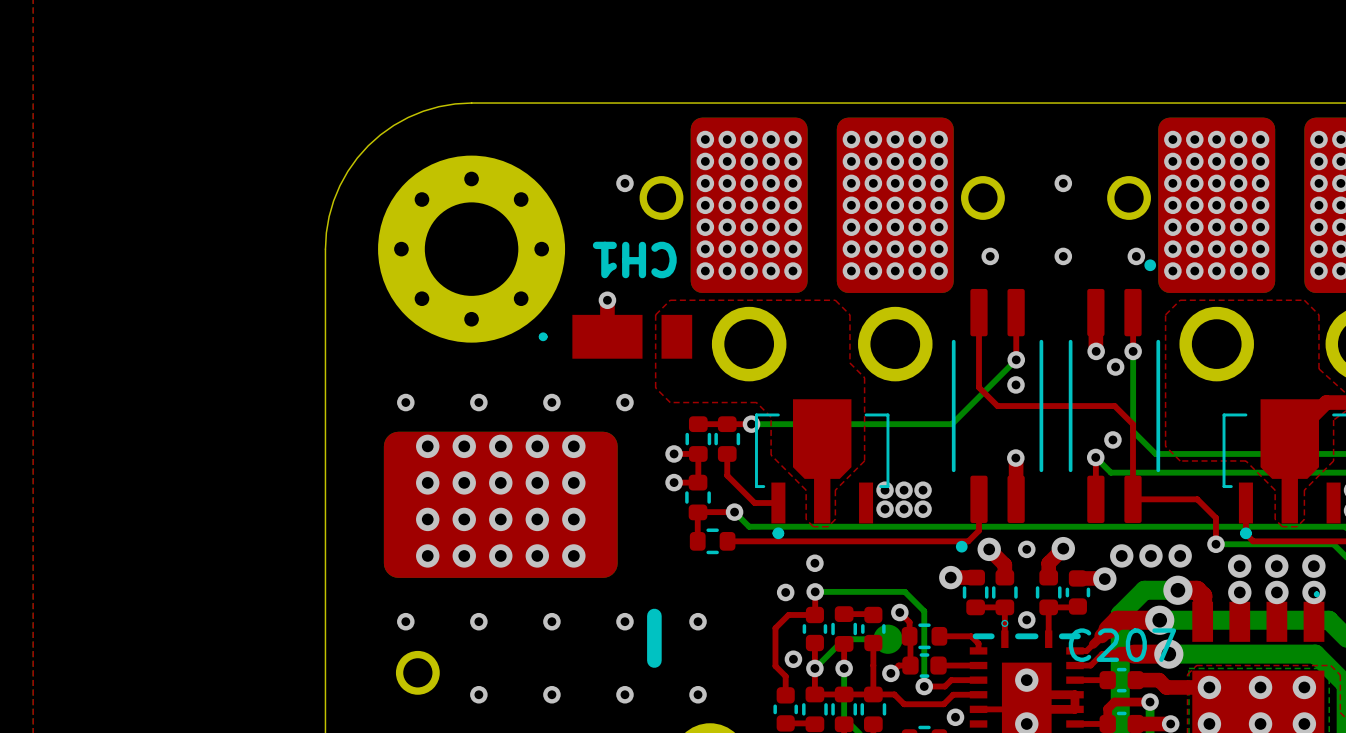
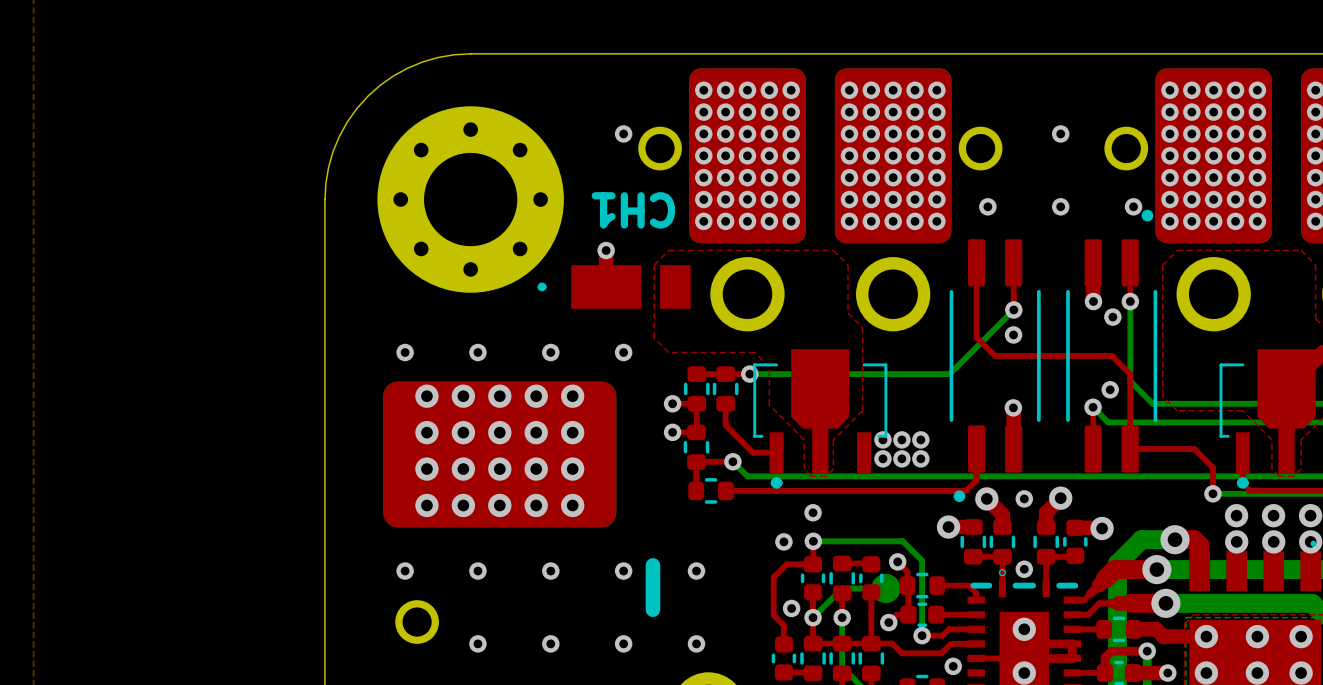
via: (1121, 555) -> none
via: (1150, 555) -> none
via: (1180, 555) -> none
C207: (1121, 680) -> none
part: none -> (1118, 629)

